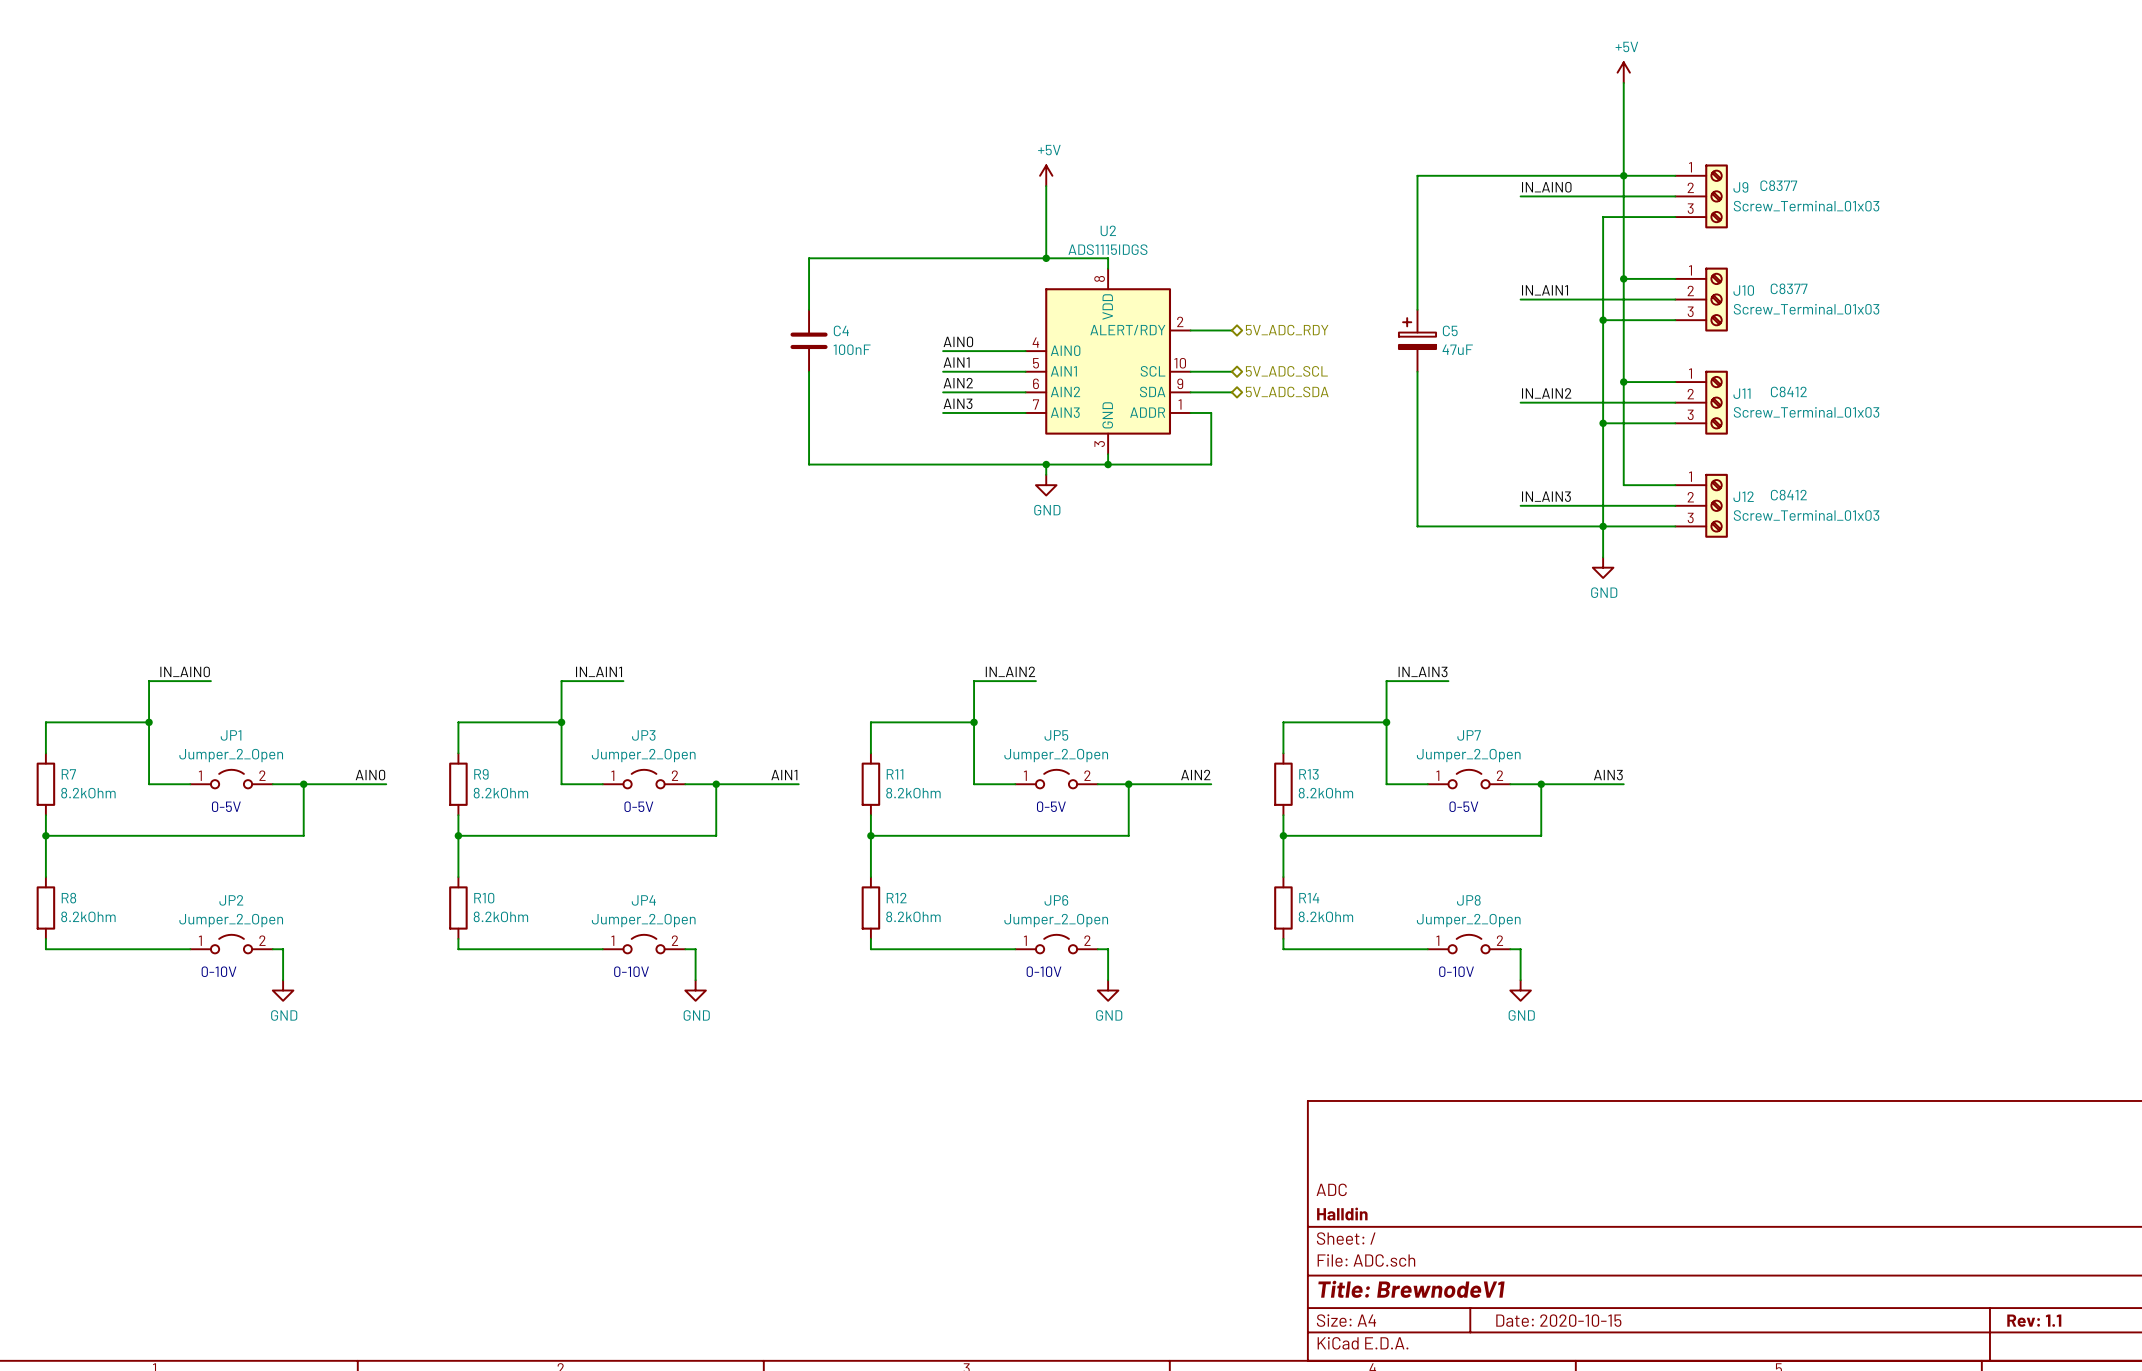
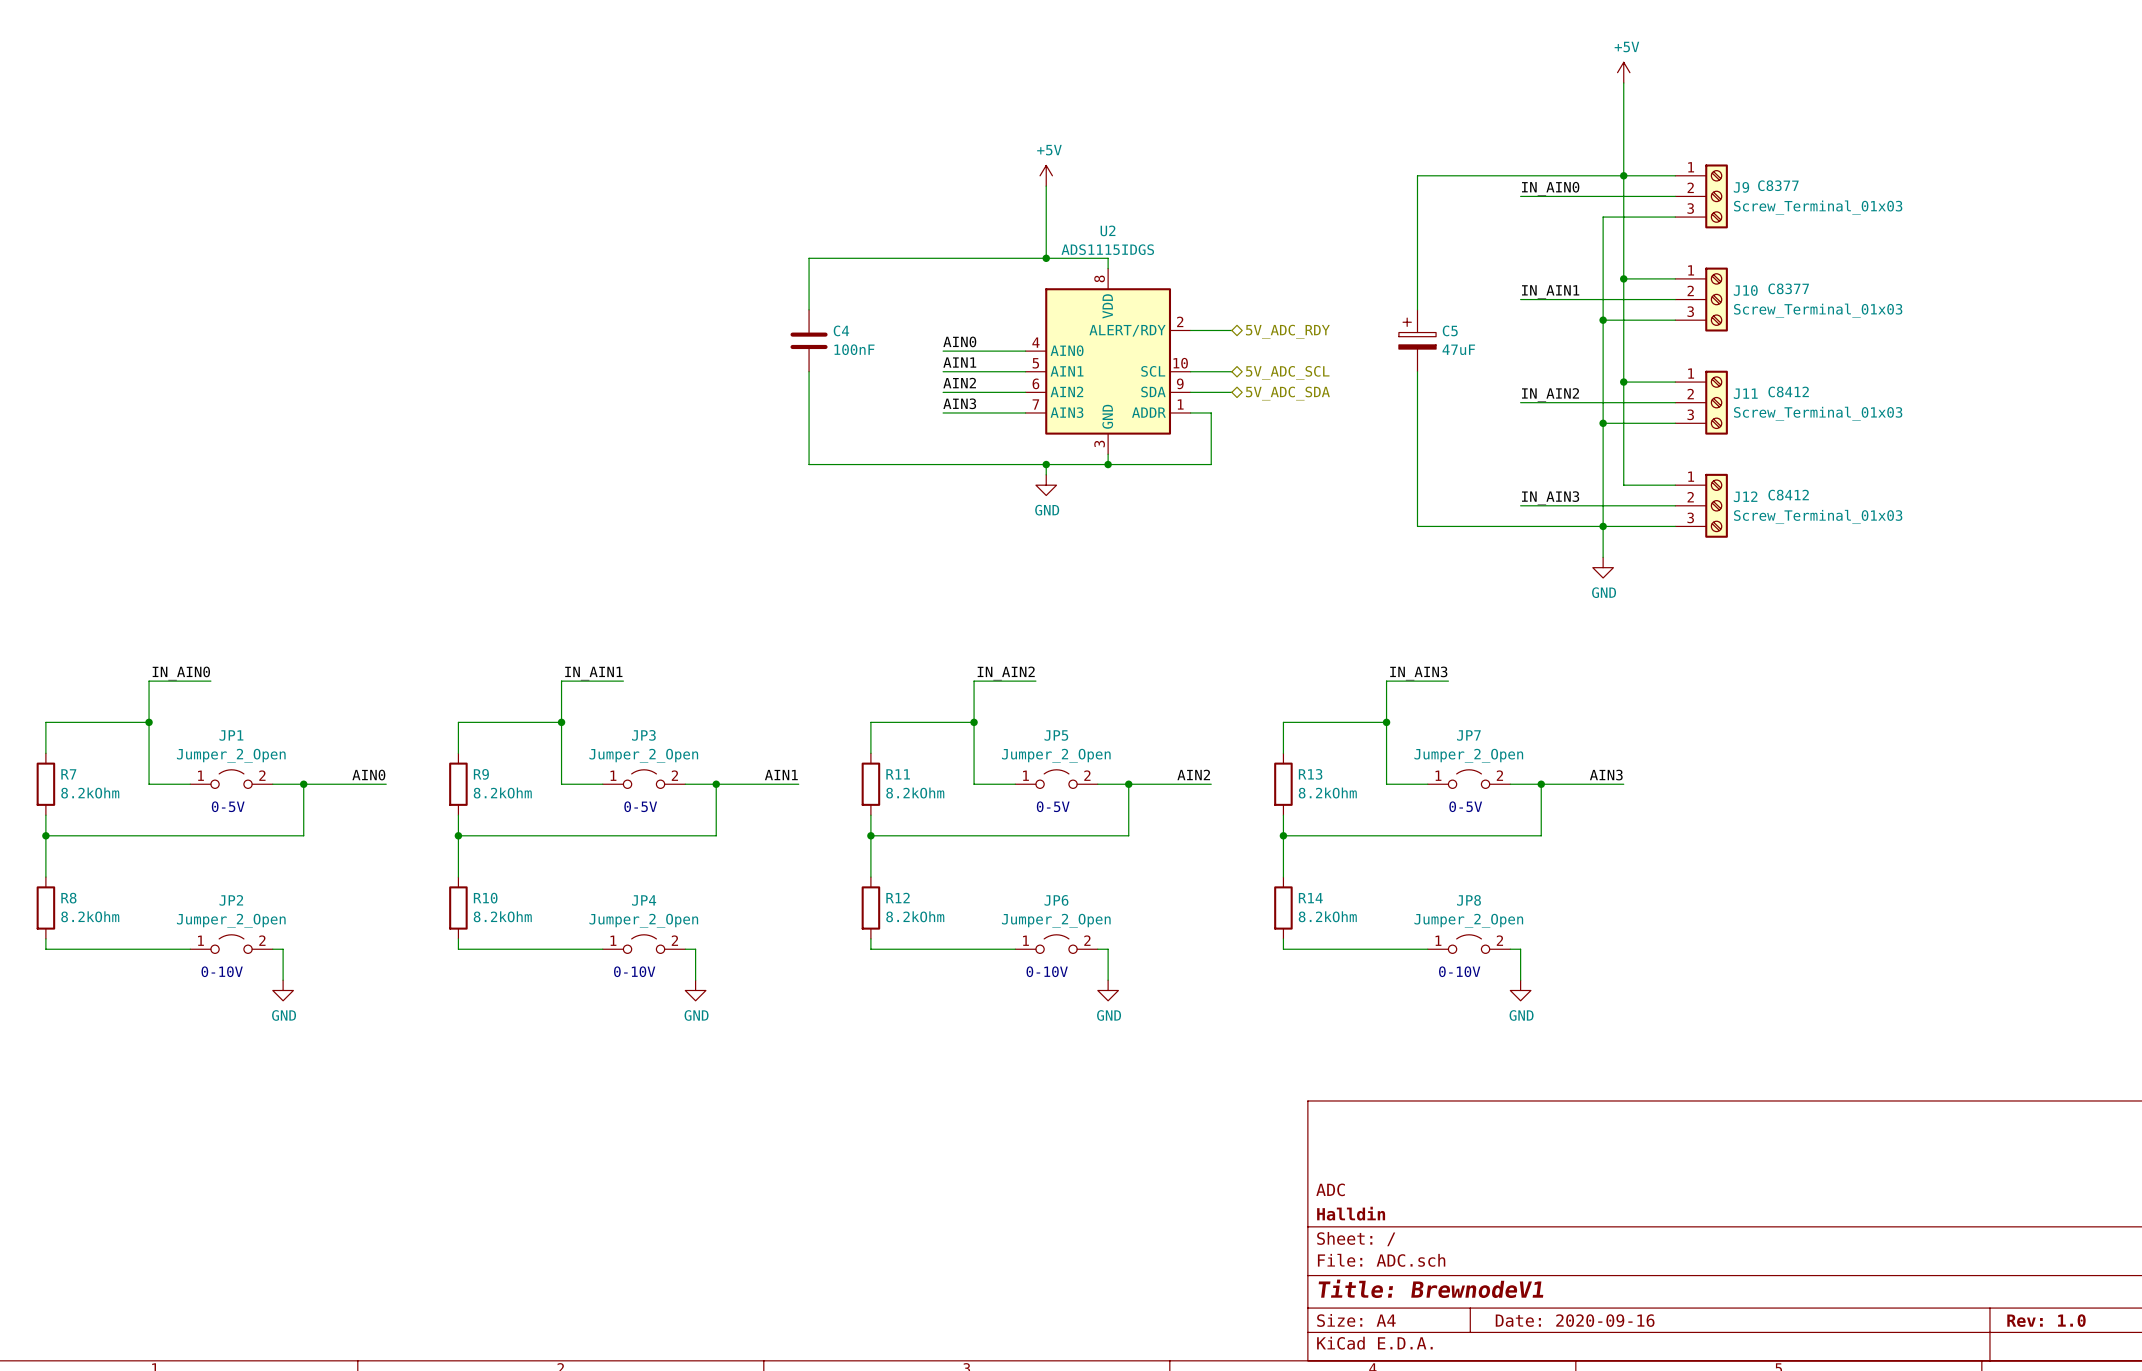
title block: Date: 2020-10-15 (1558, 1320) -> Date: 2020-09-16 (1575, 1320)
title block: Rev: 1.1 (2034, 1320) -> Rev: 1.0 (2046, 1320)

